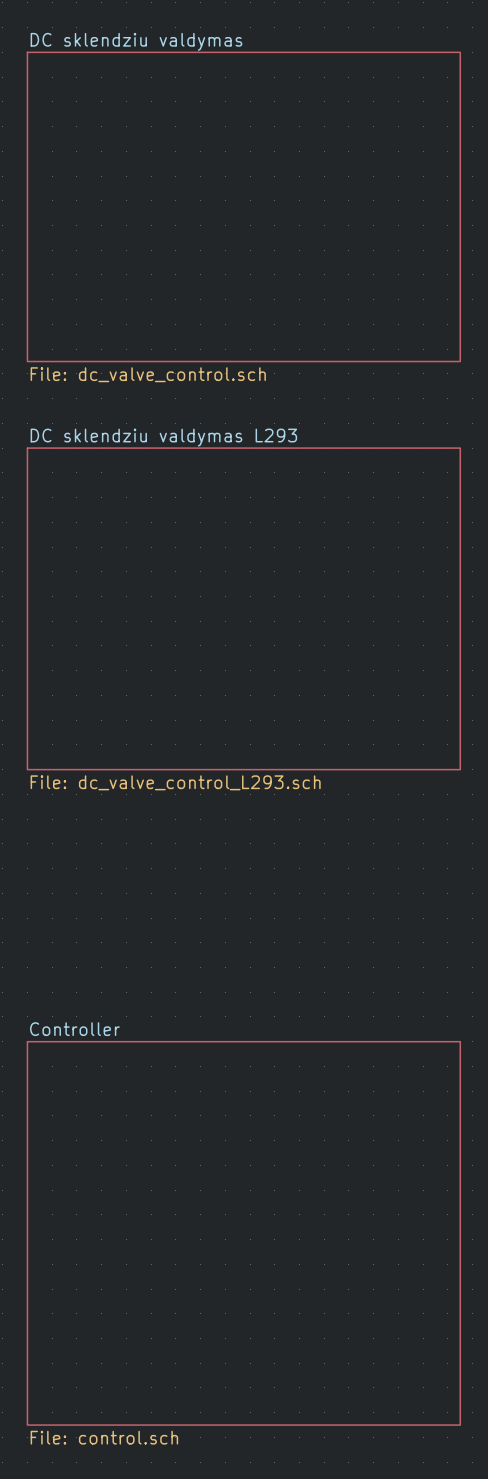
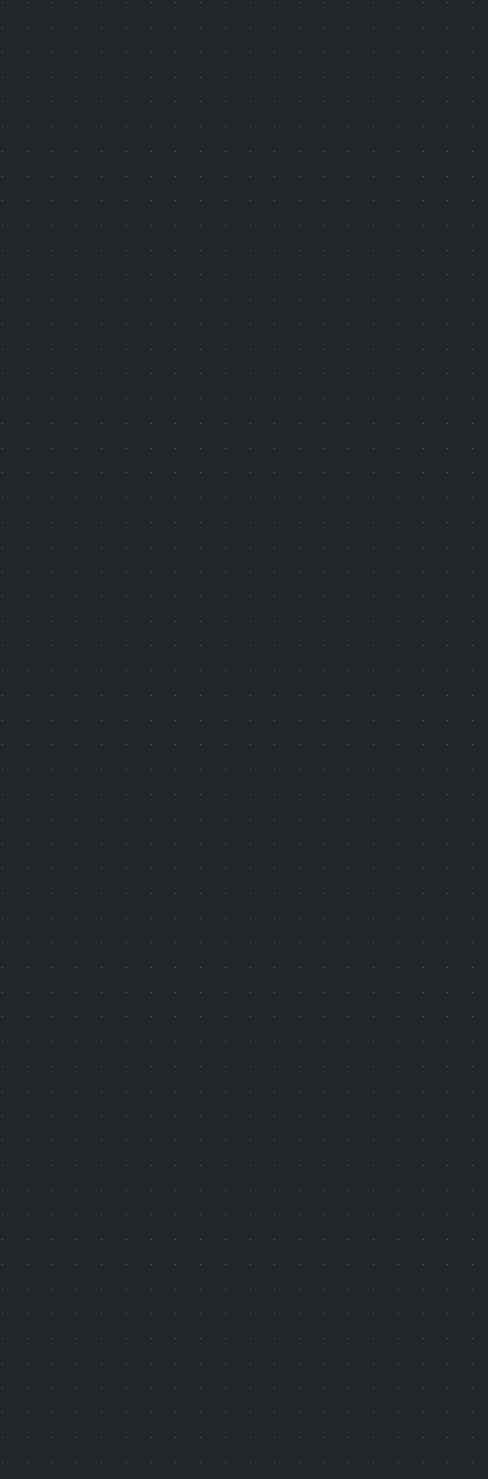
sheet DC sklendziu valdymas: File: dc_valve_control.sch (243, 206) -> none
sheet DC sklendziu valdymas L293: File: dc_valve_control_L293.sch (243, 608) -> none
sheet Controller: File: control.sch (243, 1233) -> none

